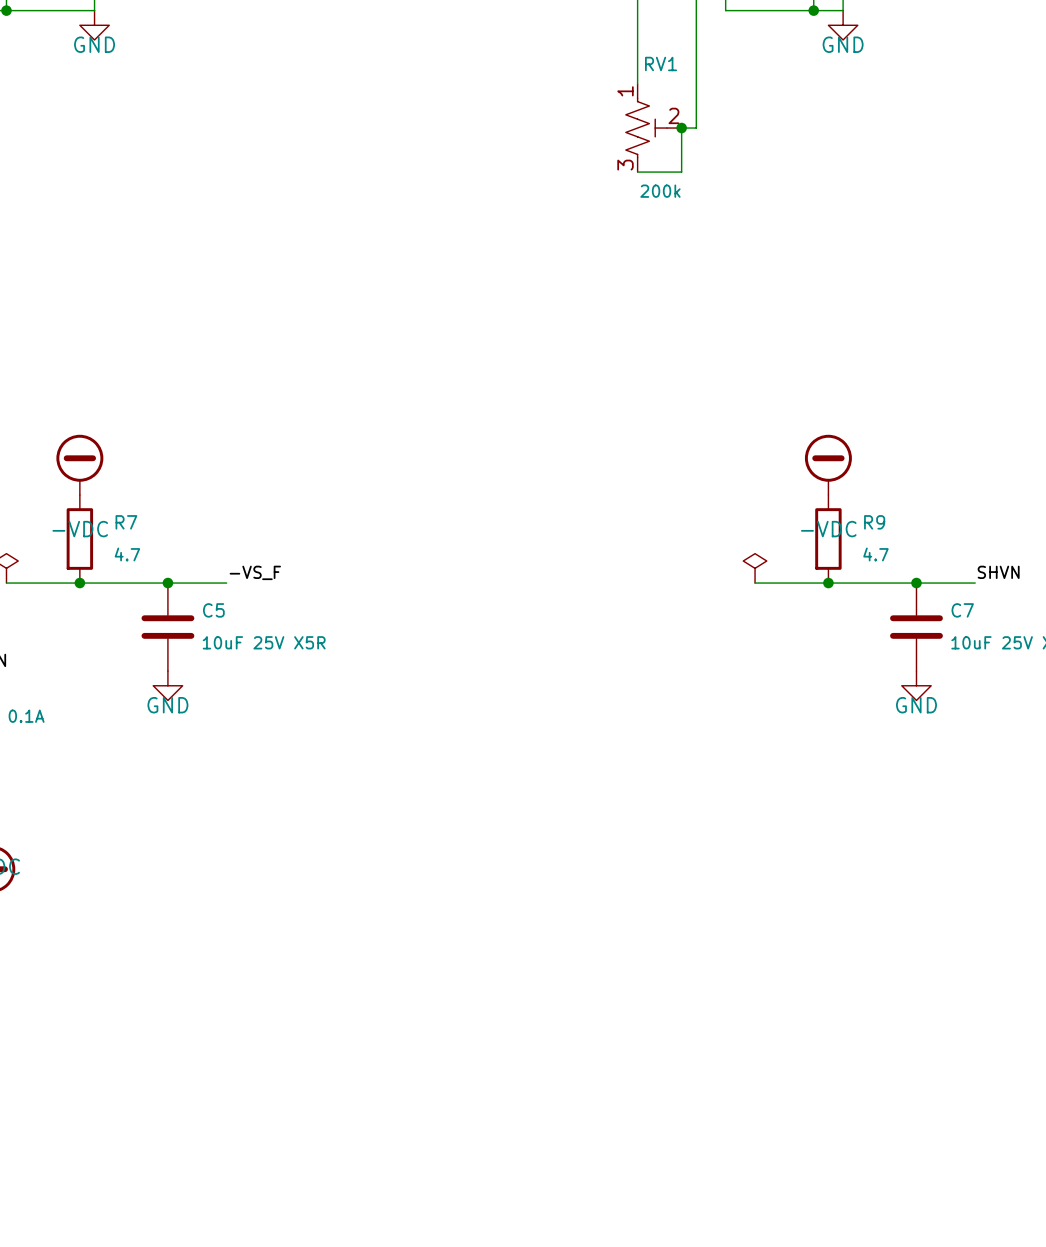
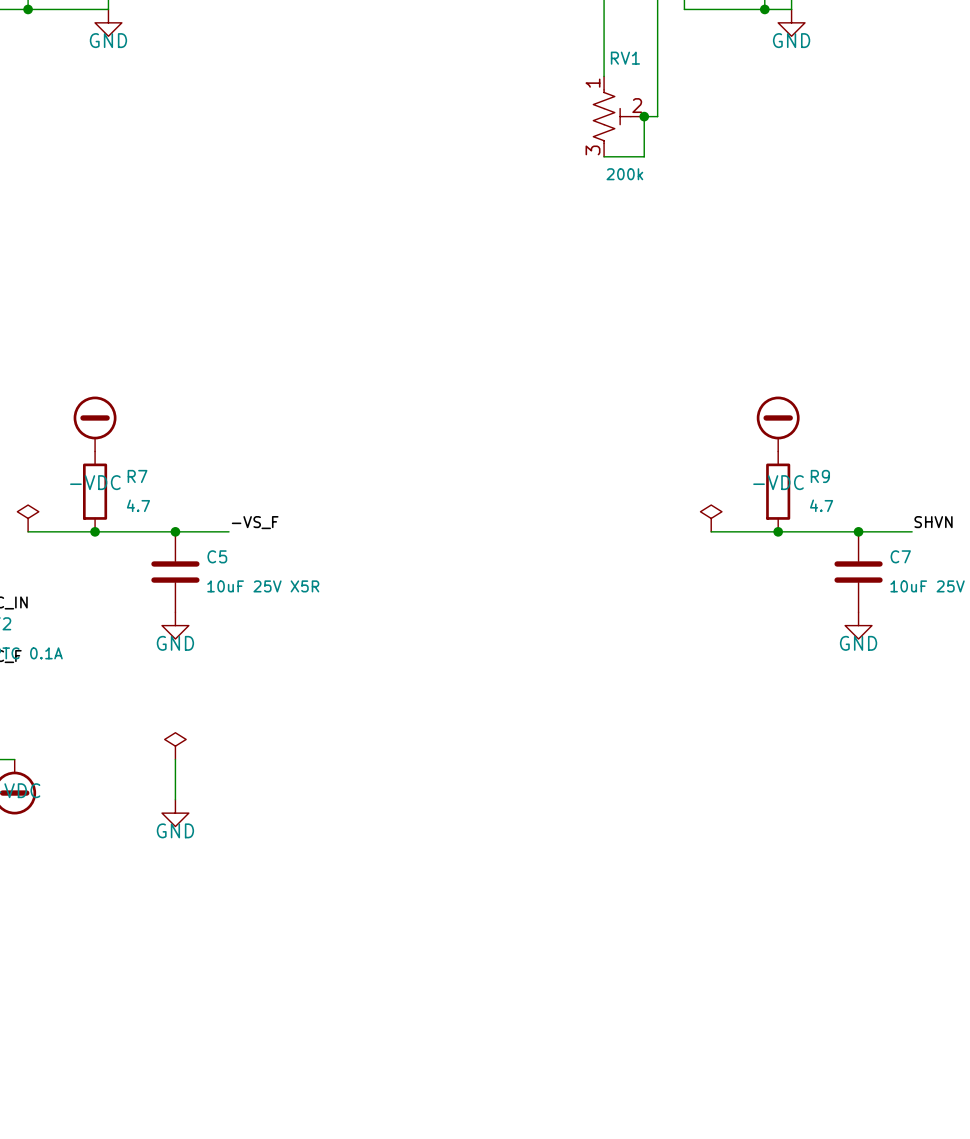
power symbol: none -> (175, 746)
wire: none -> (175, 759) (175, 799)
power symbol: none -> GND (175, 813)

